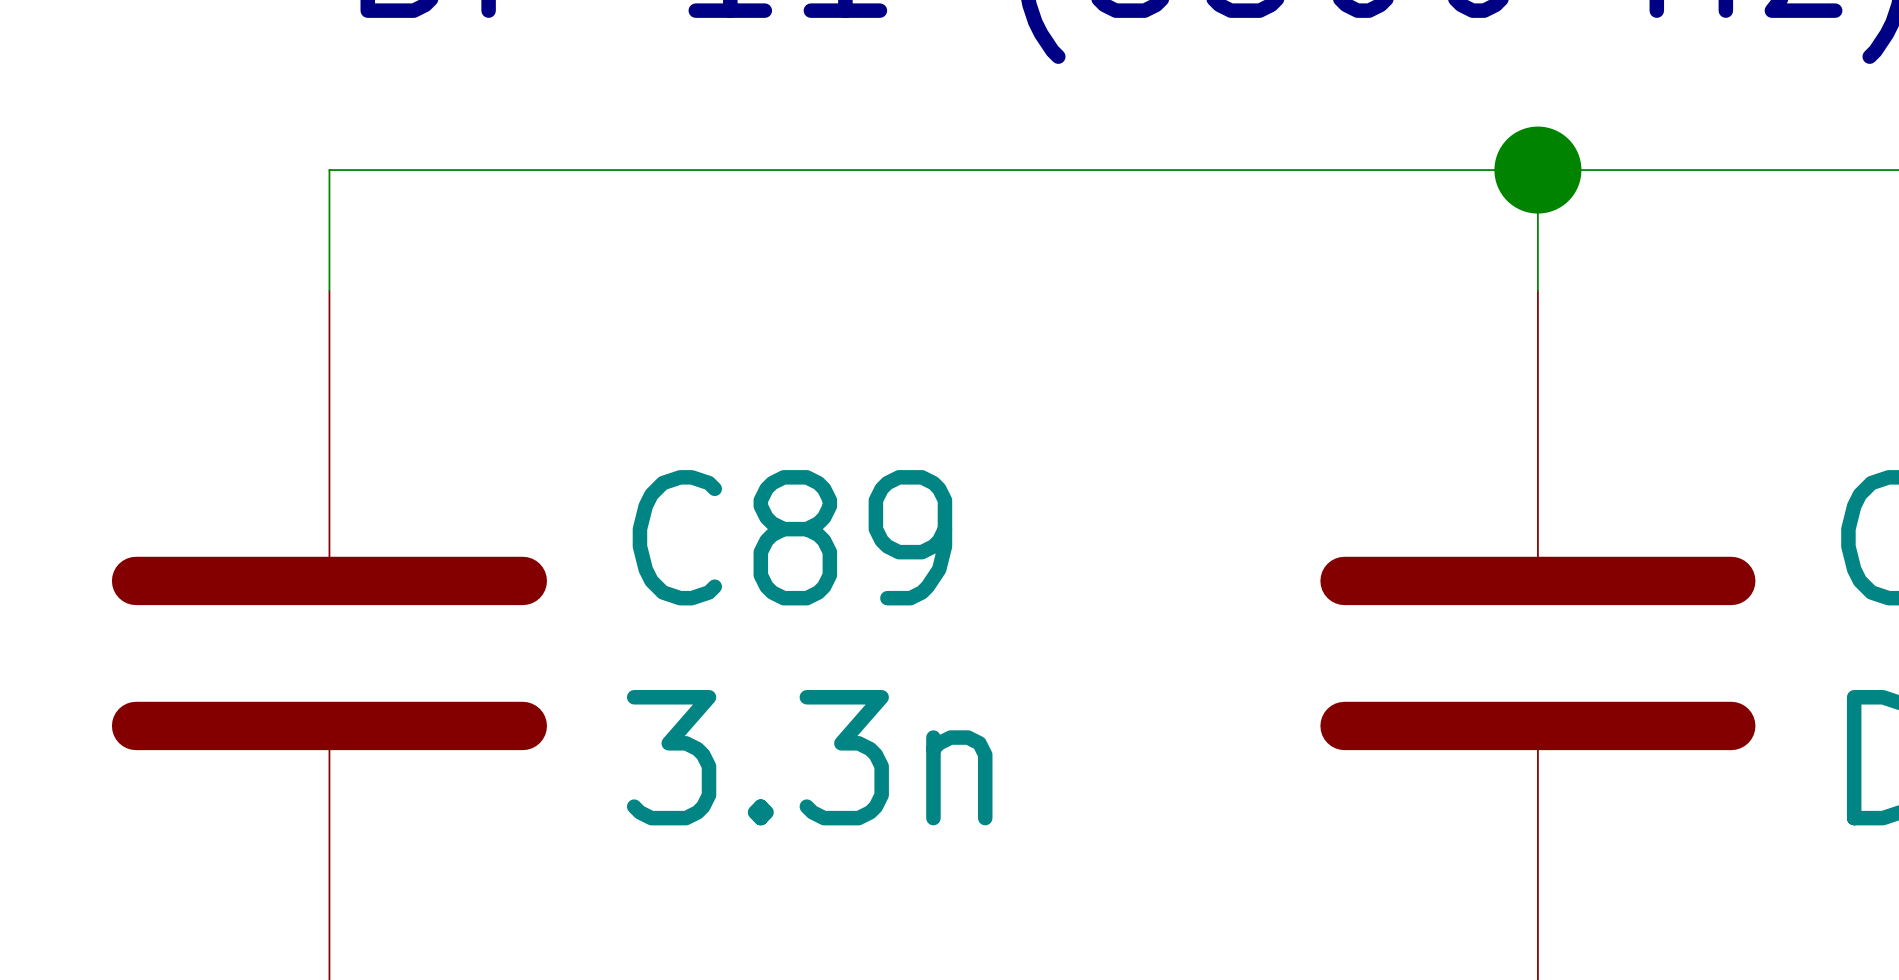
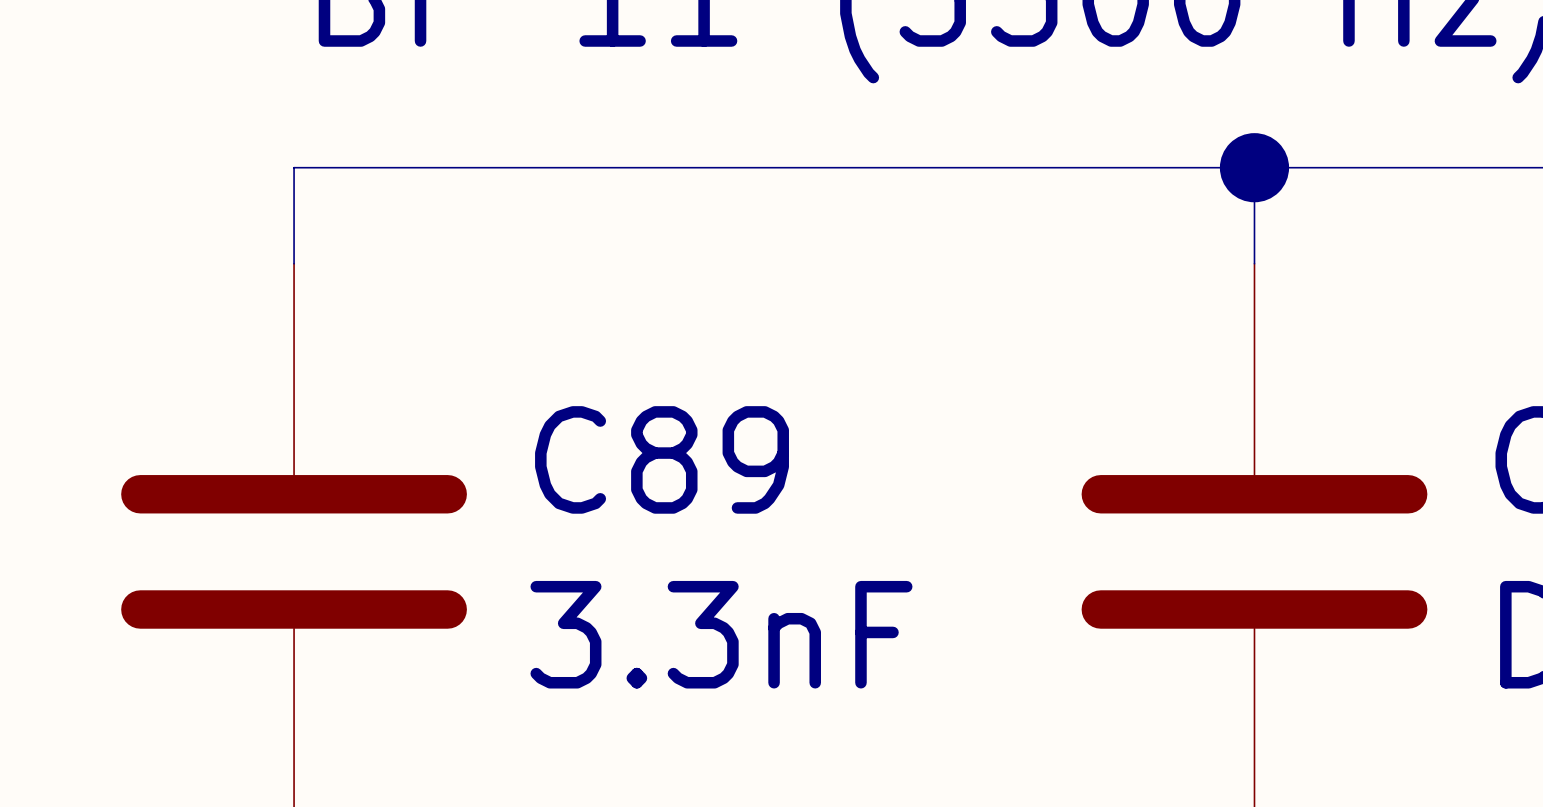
C89 value: 3.3n (809, 757) -> 3.3nF (721, 634)

